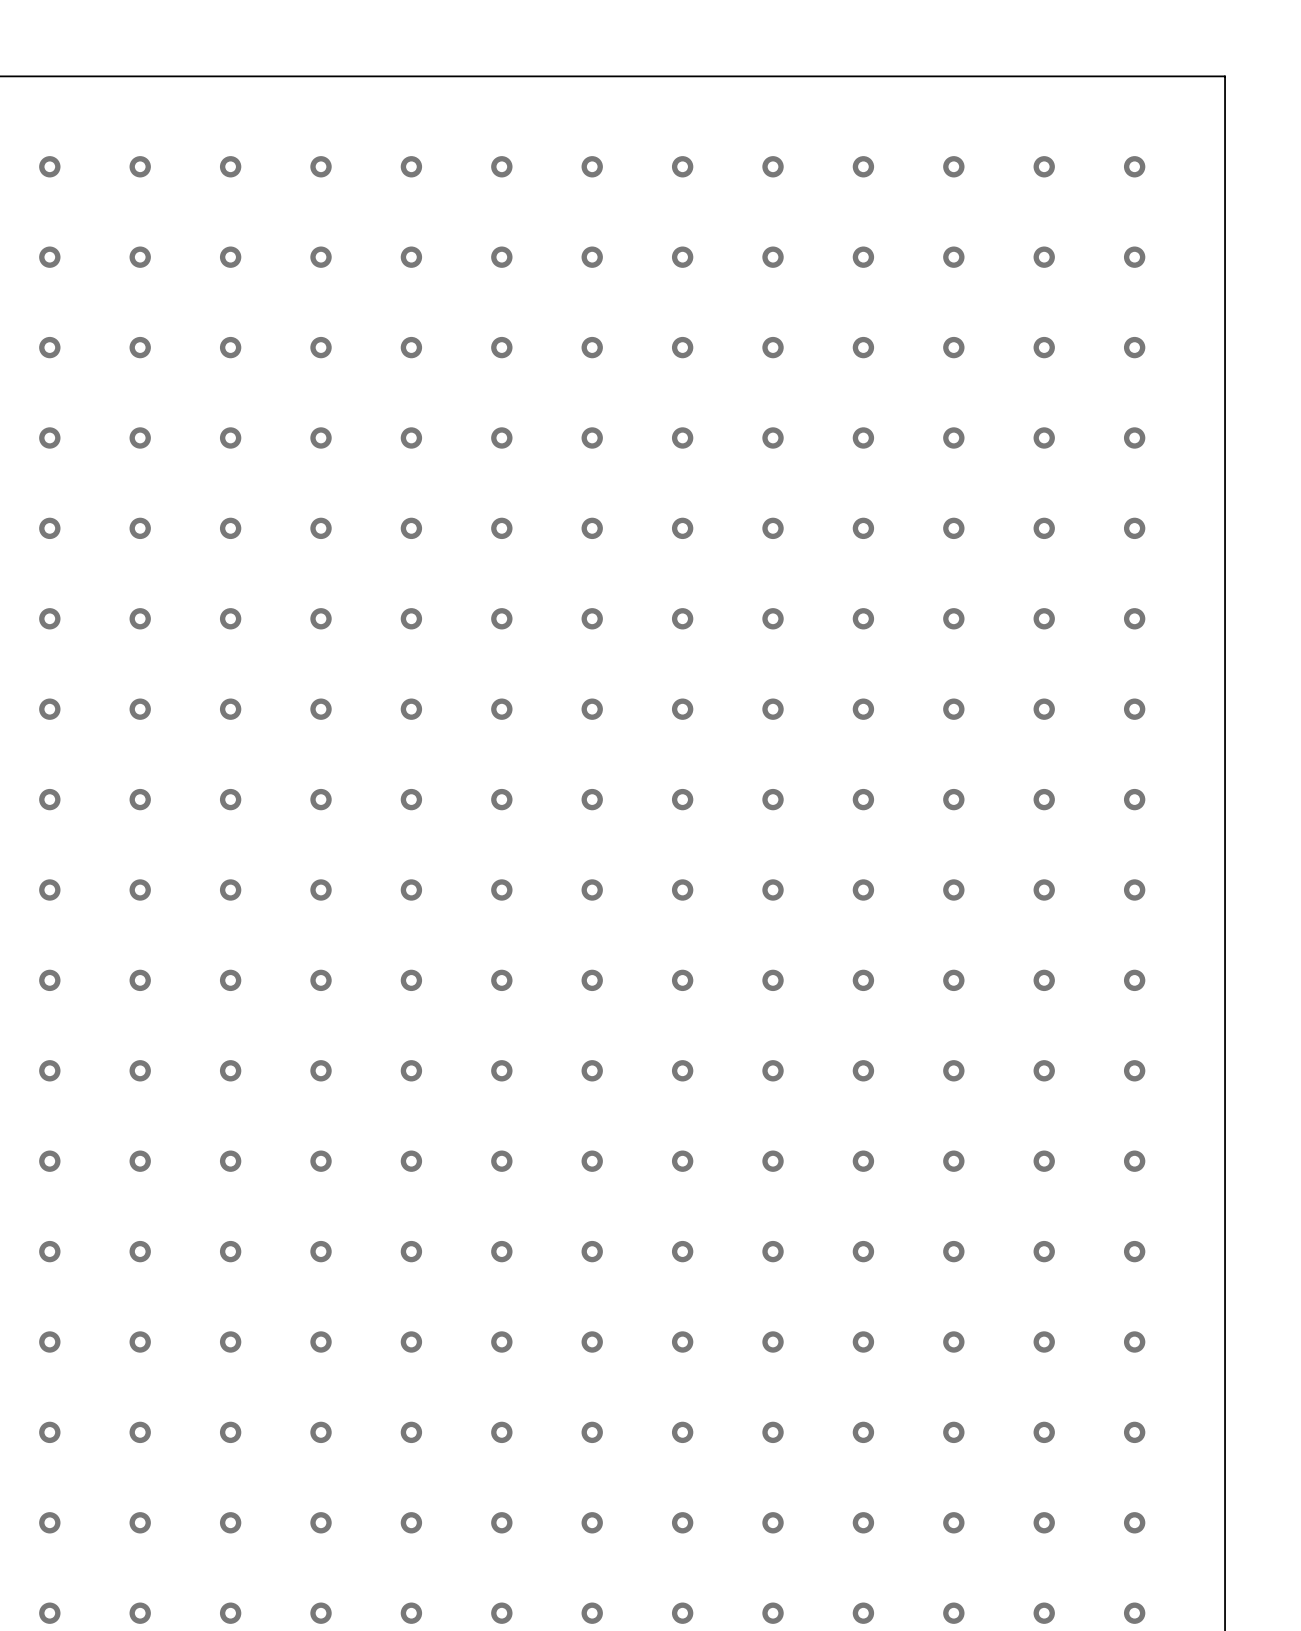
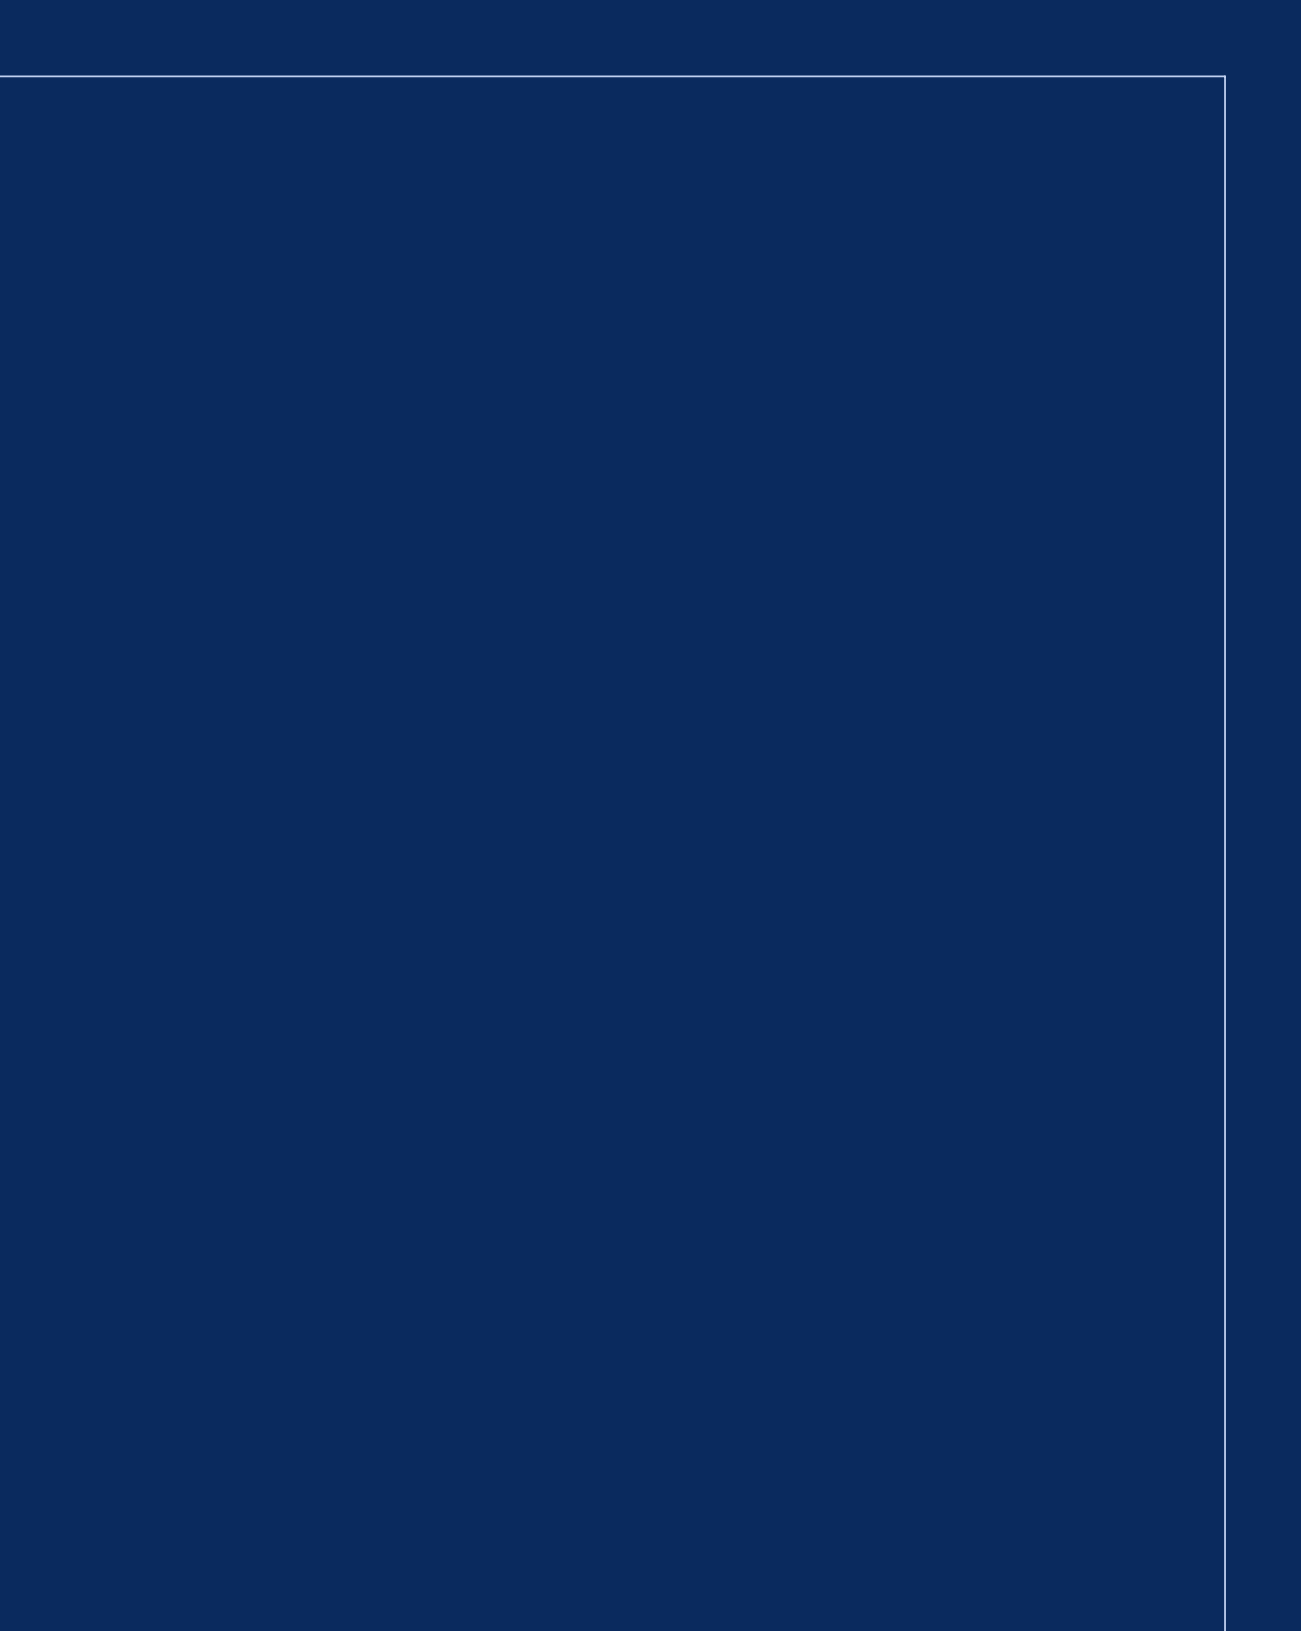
via: (49, 166) -> none
via: (140, 166) -> none
via: (230, 166) -> none
via: (321, 166) -> none
via: (411, 166) -> none
via: (501, 166) -> none
via: (592, 166) -> none
via: (682, 166) -> none
via: (773, 166) -> none
via: (863, 166) -> none
via: (953, 166) -> none
via: (1044, 166) -> none
via: (1134, 166) -> none
via: (49, 257) -> none
via: (140, 257) -> none
via: (230, 257) -> none
via: (321, 257) -> none
via: (411, 257) -> none
via: (501, 257) -> none
via: (592, 257) -> none
via: (682, 257) -> none
via: (773, 257) -> none
via: (863, 257) -> none
via: (953, 257) -> none
via: (1044, 257) -> none
via: (1134, 257) -> none
via: (49, 347) -> none
via: (140, 347) -> none
via: (230, 347) -> none
via: (321, 347) -> none
via: (411, 347) -> none
via: (501, 347) -> none
via: (592, 347) -> none
via: (682, 347) -> none
via: (773, 347) -> none
via: (863, 347) -> none
via: (953, 347) -> none
via: (1044, 347) -> none
via: (1134, 347) -> none
via: (49, 437) -> none
via: (140, 437) -> none
via: (230, 437) -> none
via: (321, 437) -> none
via: (411, 437) -> none
via: (501, 437) -> none
via: (592, 437) -> none
via: (682, 437) -> none
via: (773, 437) -> none
via: (863, 437) -> none
via: (953, 437) -> none
via: (1044, 437) -> none
via: (1134, 437) -> none
via: (49, 528) -> none
via: (140, 528) -> none
via: (230, 528) -> none
via: (321, 528) -> none
via: (411, 528) -> none
via: (501, 528) -> none
via: (592, 528) -> none
via: (682, 528) -> none
via: (773, 528) -> none
via: (863, 528) -> none
via: (953, 528) -> none
via: (1044, 528) -> none
via: (1134, 528) -> none
via: (49, 618) -> none
via: (140, 618) -> none
via: (230, 618) -> none
via: (321, 618) -> none
via: (411, 618) -> none
via: (501, 618) -> none
via: (592, 618) -> none
via: (682, 618) -> none
via: (773, 618) -> none
via: (863, 618) -> none
via: (953, 618) -> none
via: (1044, 618) -> none
via: (1134, 618) -> none
via: (49, 709) -> none
via: (140, 709) -> none
via: (230, 709) -> none
via: (321, 709) -> none
via: (411, 709) -> none
via: (501, 709) -> none
via: (592, 709) -> none
via: (682, 709) -> none
via: (773, 709) -> none
via: (863, 709) -> none
via: (953, 709) -> none
via: (1044, 709) -> none
via: (1134, 709) -> none
via: (49, 799) -> none
via: (140, 799) -> none
via: (230, 799) -> none
via: (321, 799) -> none
via: (411, 799) -> none
via: (501, 799) -> none
via: (592, 799) -> none
via: (682, 799) -> none
via: (773, 799) -> none
via: (863, 799) -> none
via: (953, 799) -> none
via: (1044, 799) -> none
via: (1134, 799) -> none
via: (49, 889) -> none
via: (140, 889) -> none
via: (230, 889) -> none
via: (321, 889) -> none
via: (411, 889) -> none
via: (501, 889) -> none
via: (592, 889) -> none
via: (682, 889) -> none
via: (773, 889) -> none
via: (863, 889) -> none
via: (953, 889) -> none
via: (1044, 889) -> none
via: (1134, 889) -> none
via: (49, 980) -> none
via: (140, 980) -> none
via: (230, 980) -> none
via: (321, 980) -> none
via: (411, 980) -> none
via: (501, 980) -> none
via: (592, 980) -> none
via: (682, 980) -> none
via: (773, 980) -> none
via: (863, 980) -> none
via: (953, 980) -> none
via: (1044, 980) -> none
via: (1134, 980) -> none
via: (49, 1070) -> none
via: (140, 1070) -> none
via: (230, 1070) -> none
via: (321, 1070) -> none
via: (411, 1070) -> none
via: (501, 1070) -> none
via: (592, 1070) -> none
via: (682, 1070) -> none
via: (773, 1070) -> none
via: (863, 1070) -> none
via: (953, 1070) -> none
via: (1044, 1070) -> none
via: (1134, 1070) -> none
via: (49, 1161) -> none
via: (140, 1161) -> none
via: (230, 1161) -> none
via: (321, 1161) -> none
via: (411, 1161) -> none
via: (501, 1161) -> none
via: (592, 1161) -> none
via: (682, 1161) -> none
via: (773, 1161) -> none
via: (863, 1161) -> none
via: (953, 1161) -> none
via: (1044, 1161) -> none
via: (1134, 1161) -> none
via: (49, 1251) -> none
via: (140, 1251) -> none
via: (230, 1251) -> none
via: (321, 1251) -> none
via: (411, 1251) -> none
via: (501, 1251) -> none
via: (592, 1251) -> none
via: (682, 1251) -> none
via: (773, 1251) -> none
via: (863, 1251) -> none
via: (953, 1251) -> none
via: (1044, 1251) -> none
via: (1134, 1251) -> none
via: (49, 1341) -> none
via: (140, 1341) -> none
via: (230, 1341) -> none
via: (321, 1341) -> none
via: (411, 1341) -> none
via: (501, 1341) -> none
via: (592, 1341) -> none
via: (682, 1341) -> none
via: (773, 1341) -> none
via: (863, 1341) -> none
via: (953, 1341) -> none
via: (1044, 1341) -> none
via: (1134, 1341) -> none
via: (49, 1432) -> none
via: (140, 1432) -> none
via: (230, 1432) -> none
via: (321, 1432) -> none
via: (411, 1432) -> none
via: (501, 1432) -> none
via: (592, 1432) -> none
via: (682, 1432) -> none
via: (773, 1432) -> none
via: (863, 1432) -> none
via: (953, 1432) -> none
via: (1044, 1432) -> none
via: (1134, 1432) -> none
via: (49, 1522) -> none
via: (140, 1522) -> none
via: (230, 1522) -> none
via: (321, 1522) -> none
via: (411, 1522) -> none
via: (501, 1522) -> none
via: (592, 1522) -> none
via: (682, 1522) -> none
via: (773, 1522) -> none
via: (863, 1522) -> none
via: (953, 1522) -> none
via: (1044, 1522) -> none
via: (1134, 1522) -> none
via: (49, 1613) -> none
via: (140, 1613) -> none
via: (230, 1613) -> none
via: (321, 1613) -> none
via: (411, 1613) -> none
via: (501, 1613) -> none
via: (592, 1613) -> none
via: (682, 1613) -> none
via: (773, 1613) -> none
via: (863, 1613) -> none
via: (953, 1613) -> none
via: (1044, 1613) -> none
via: (1134, 1613) -> none

